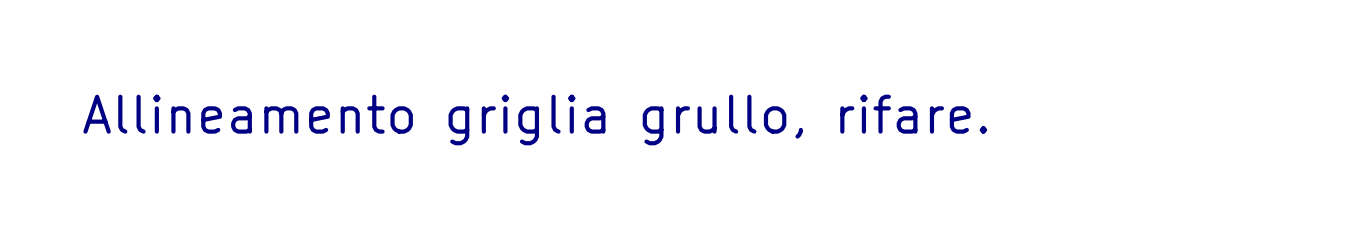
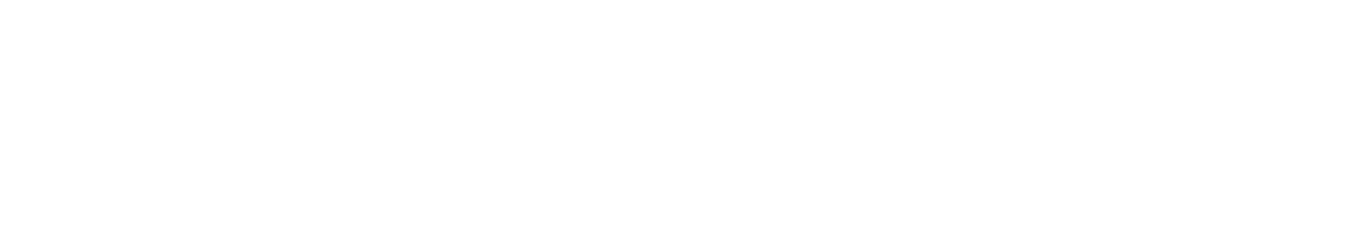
text: Allineamento griglia grullo, rifare. (535, 119) -> none

